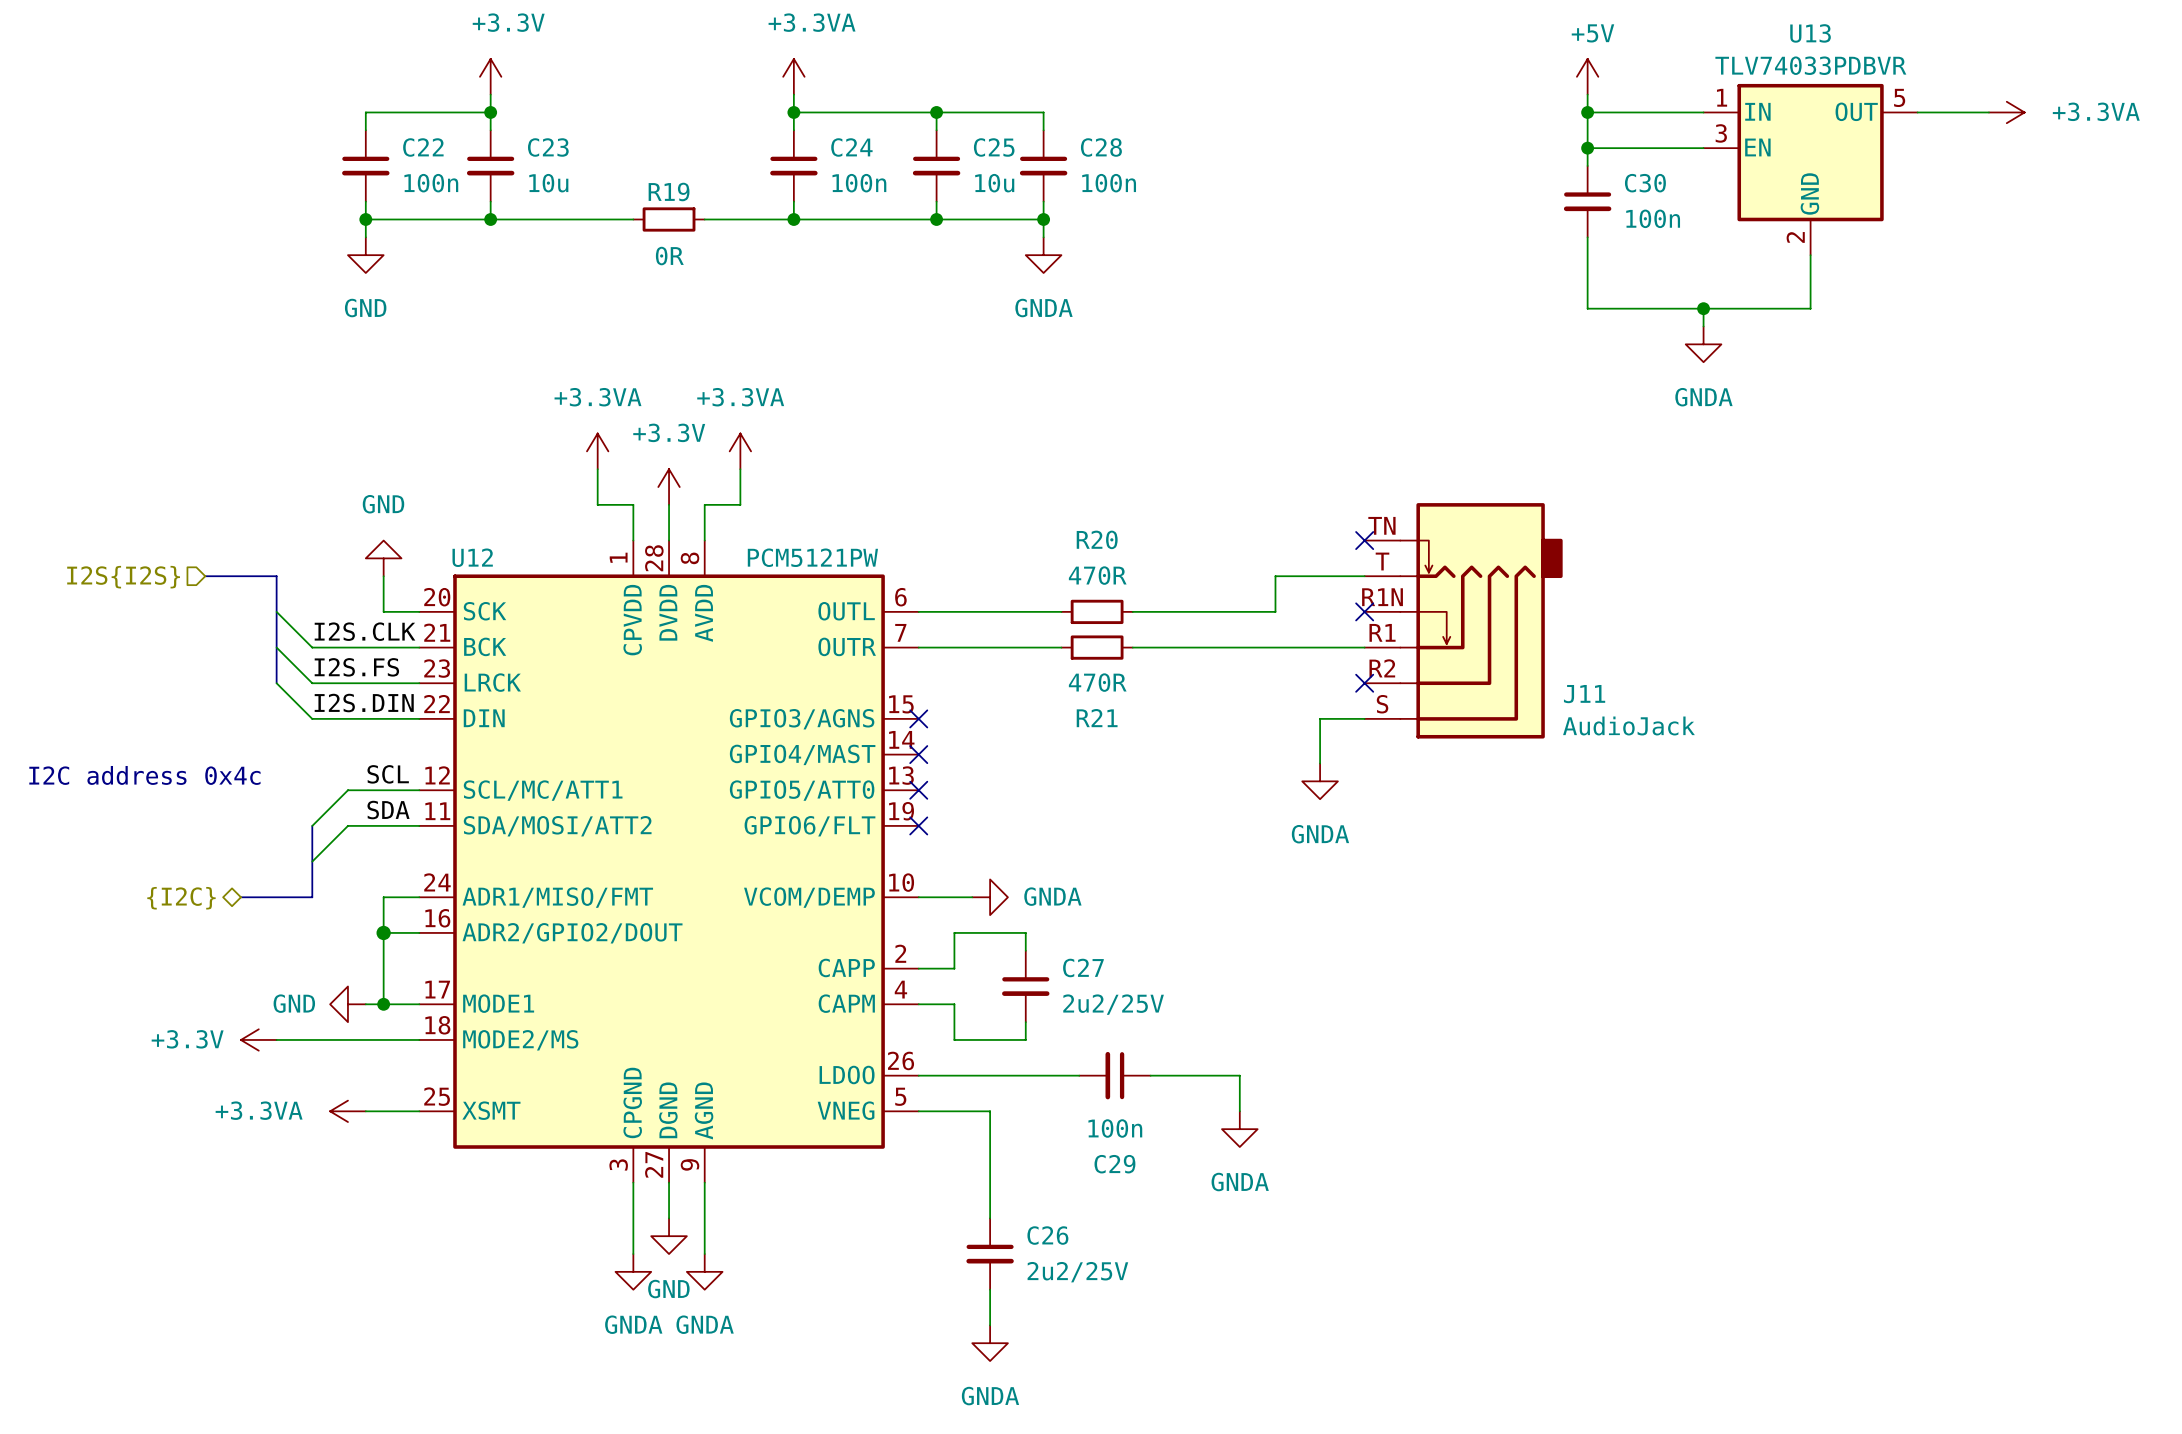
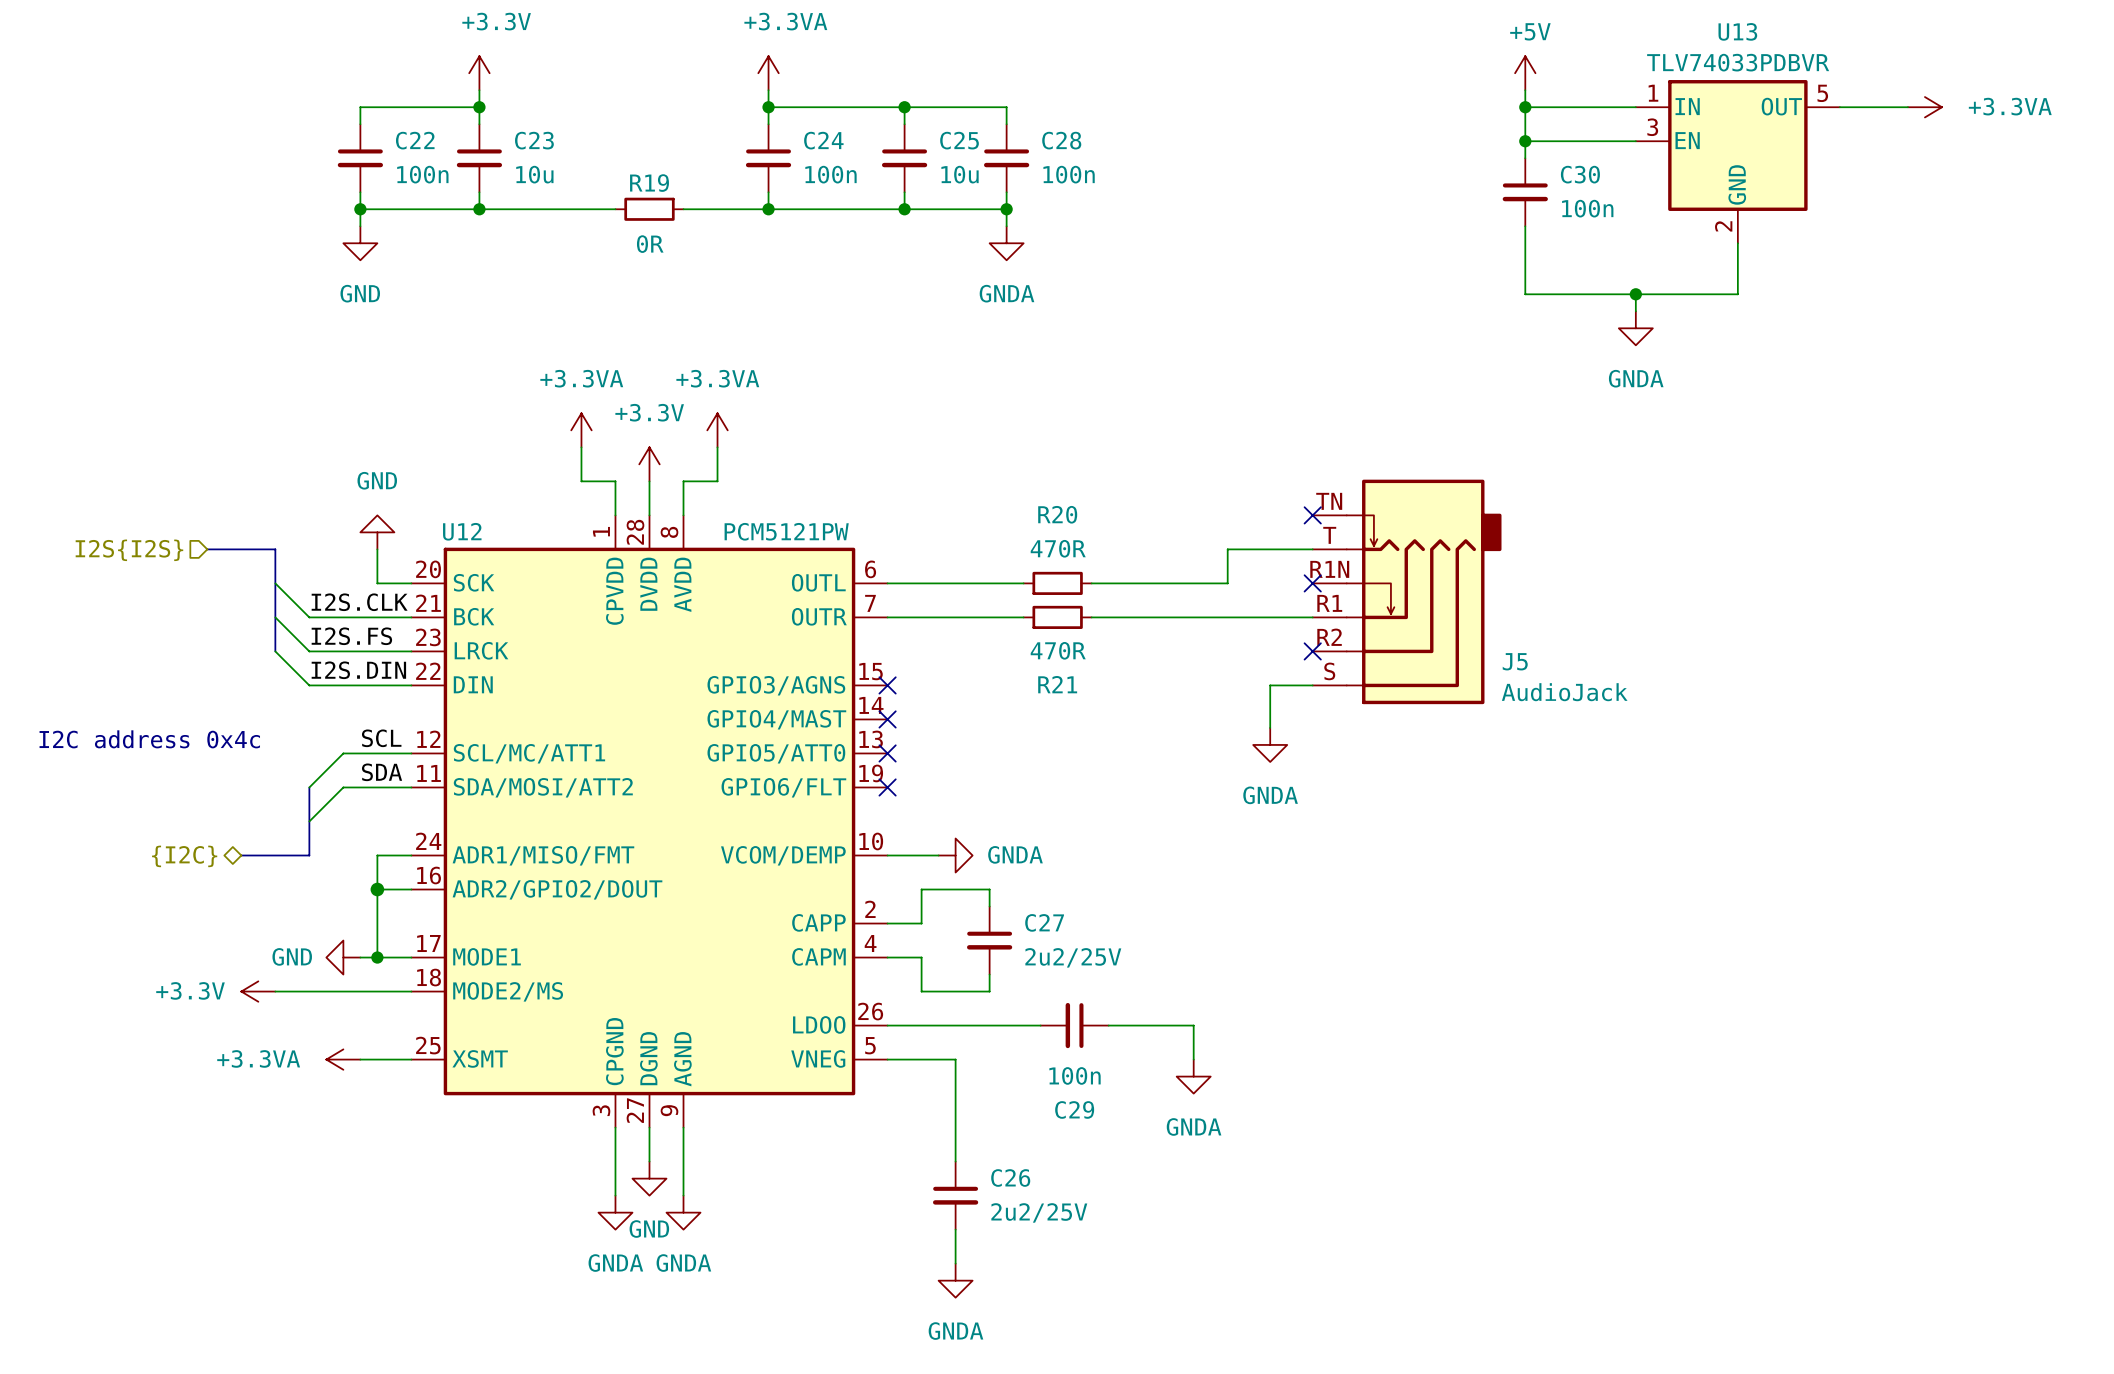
J11 name: J11 (1584, 694) -> J5 (1515, 661)

